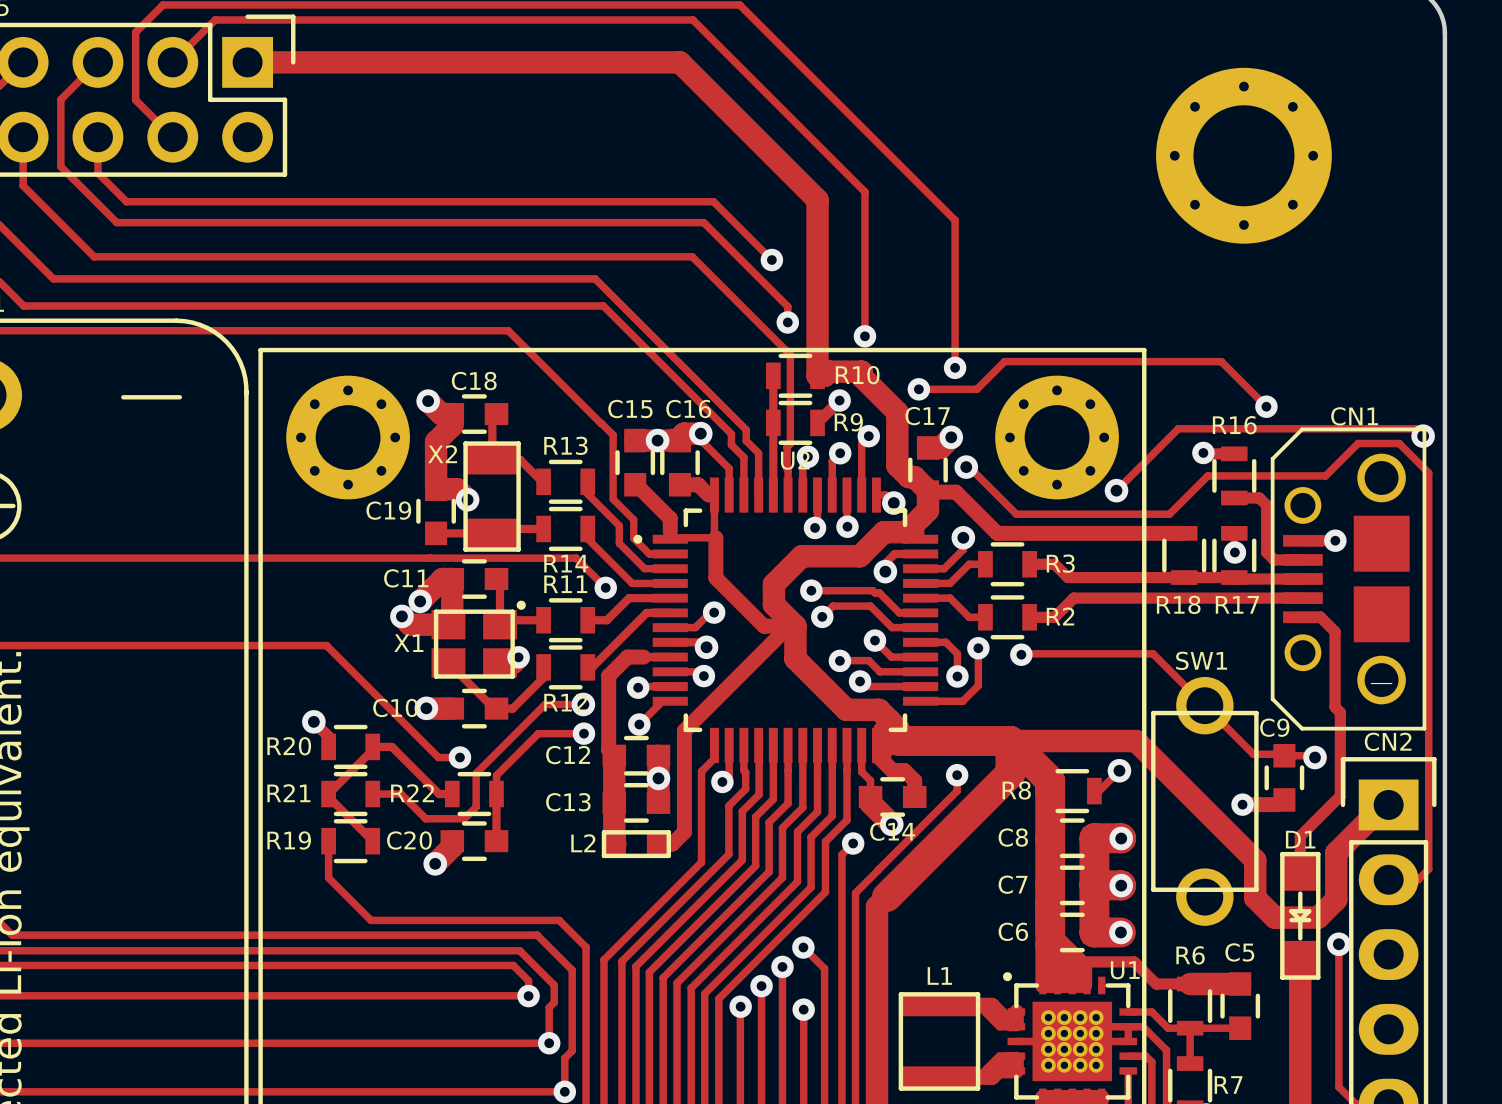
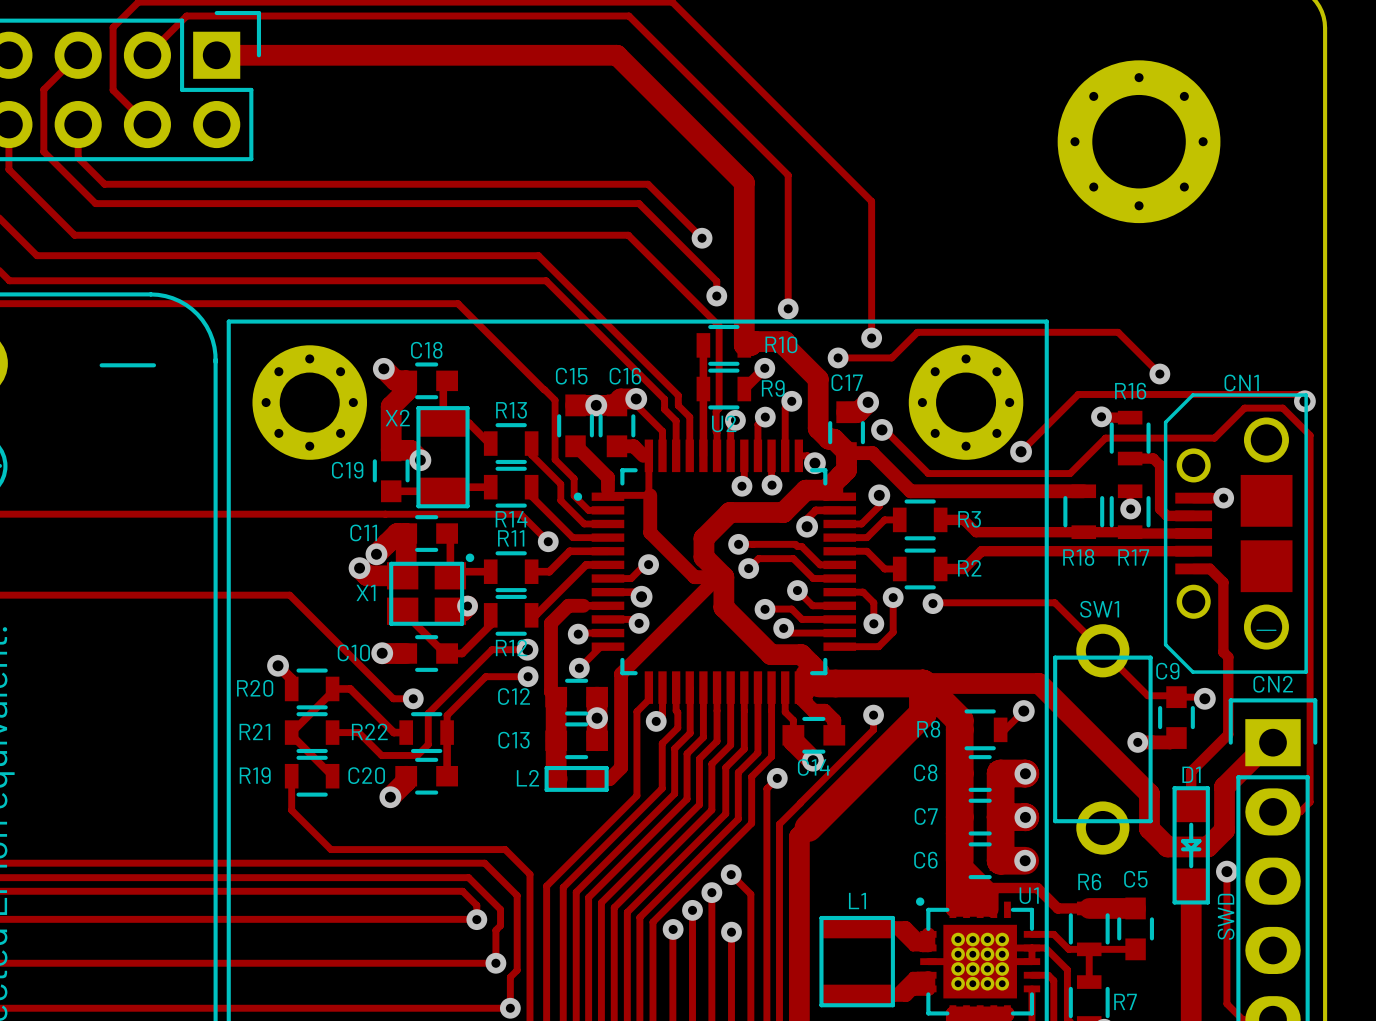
text: none -> SWD (1226, 916)

